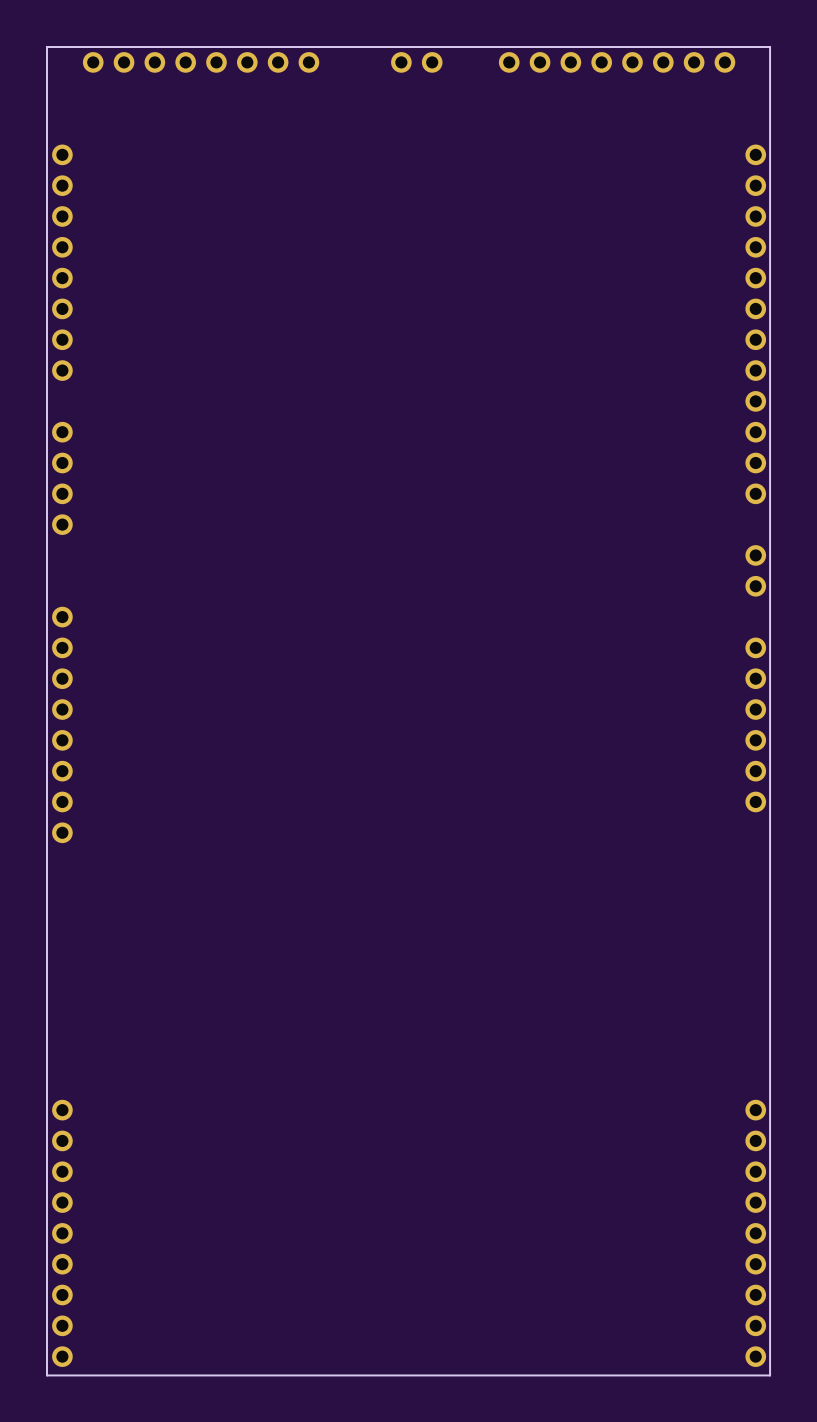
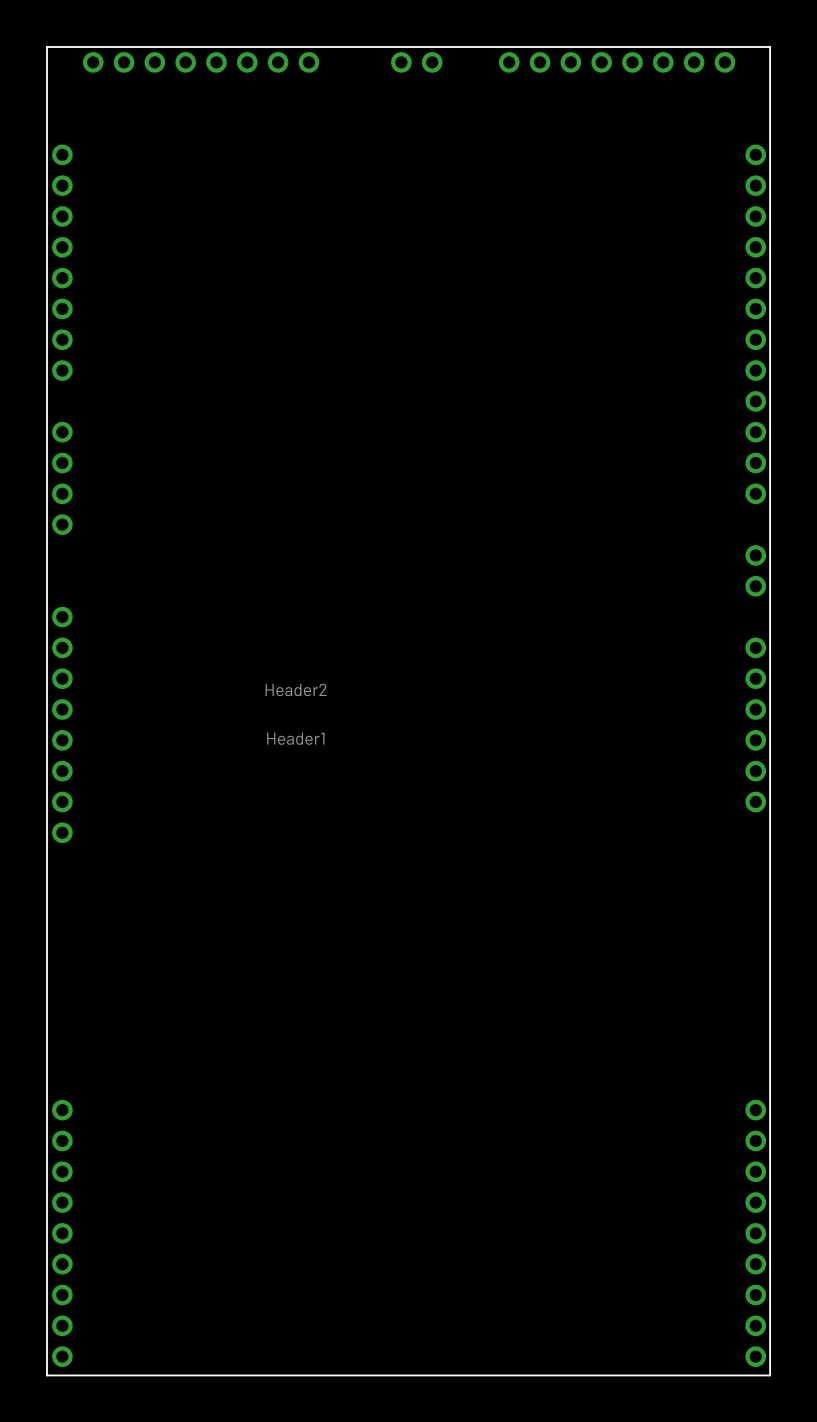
drawing: none -> [265, 683, 327, 697]
drawing: none -> [267, 732, 325, 745]

